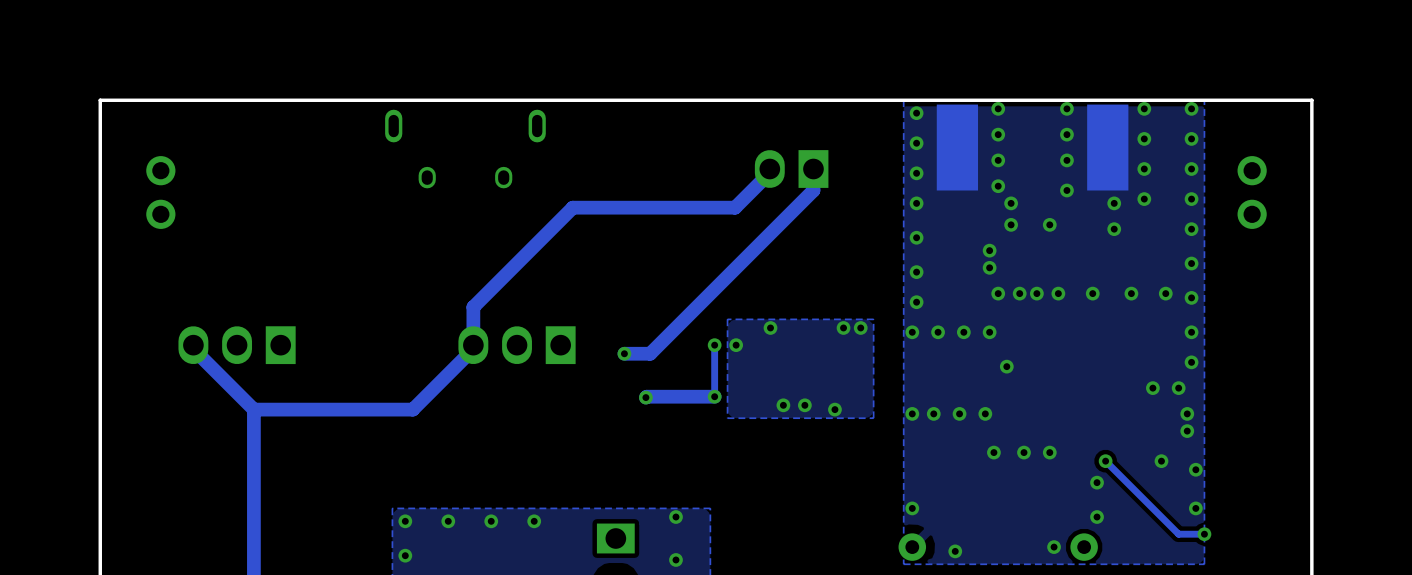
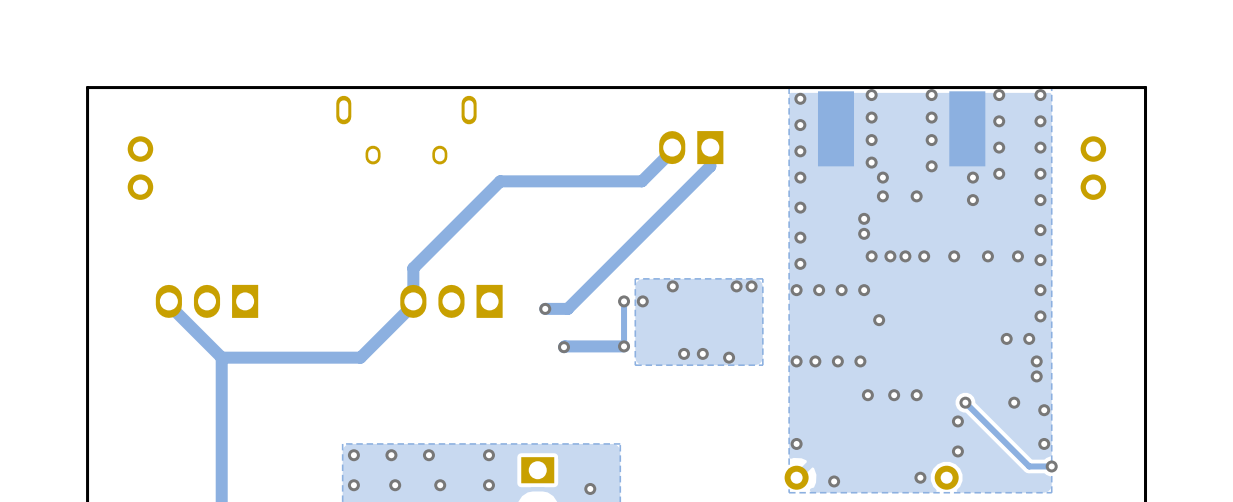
via: (675, 517) -> none
via: (534, 521) -> none
via: none -> (488, 455)
via: none -> (395, 485)
via: none -> (440, 485)
via: none -> (488, 485)

